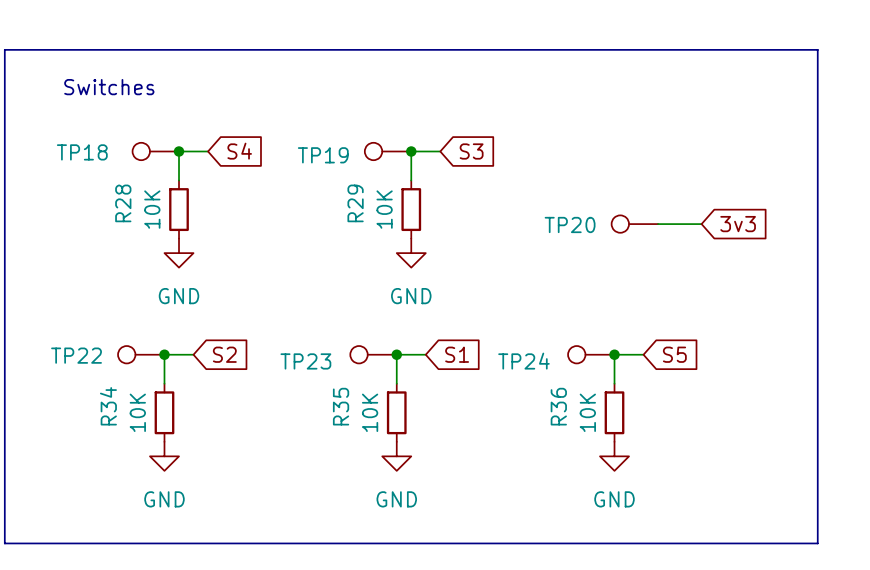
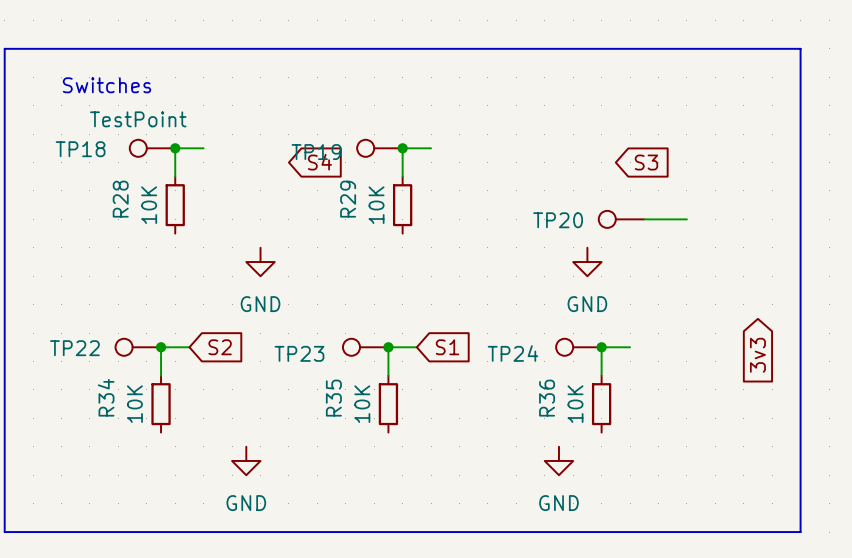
TP18 value: none -> TestPoint (138, 119)
global label position: S4 (239, 151) -> S4 (319, 162)
global label position: S3 (471, 151) -> S3 (646, 162)
global label rotation: 0° (738, 224) -> 90° clockwise (757, 355)
global label position: 3v3 (738, 224) -> 3v3 (757, 355)
power symbol: GND (179, 253) -> none
power symbol: GND (411, 253) -> none
power symbol: none -> GND (260, 262)
power symbol: none -> GND (587, 262)
global label: S5 (674, 354) -> none
power symbol: GND (164, 456) -> none
power symbol: GND (396, 456) -> none
power symbol position: GND (614, 456) -> GND (558, 460)
power symbol: none -> GND (246, 460)

